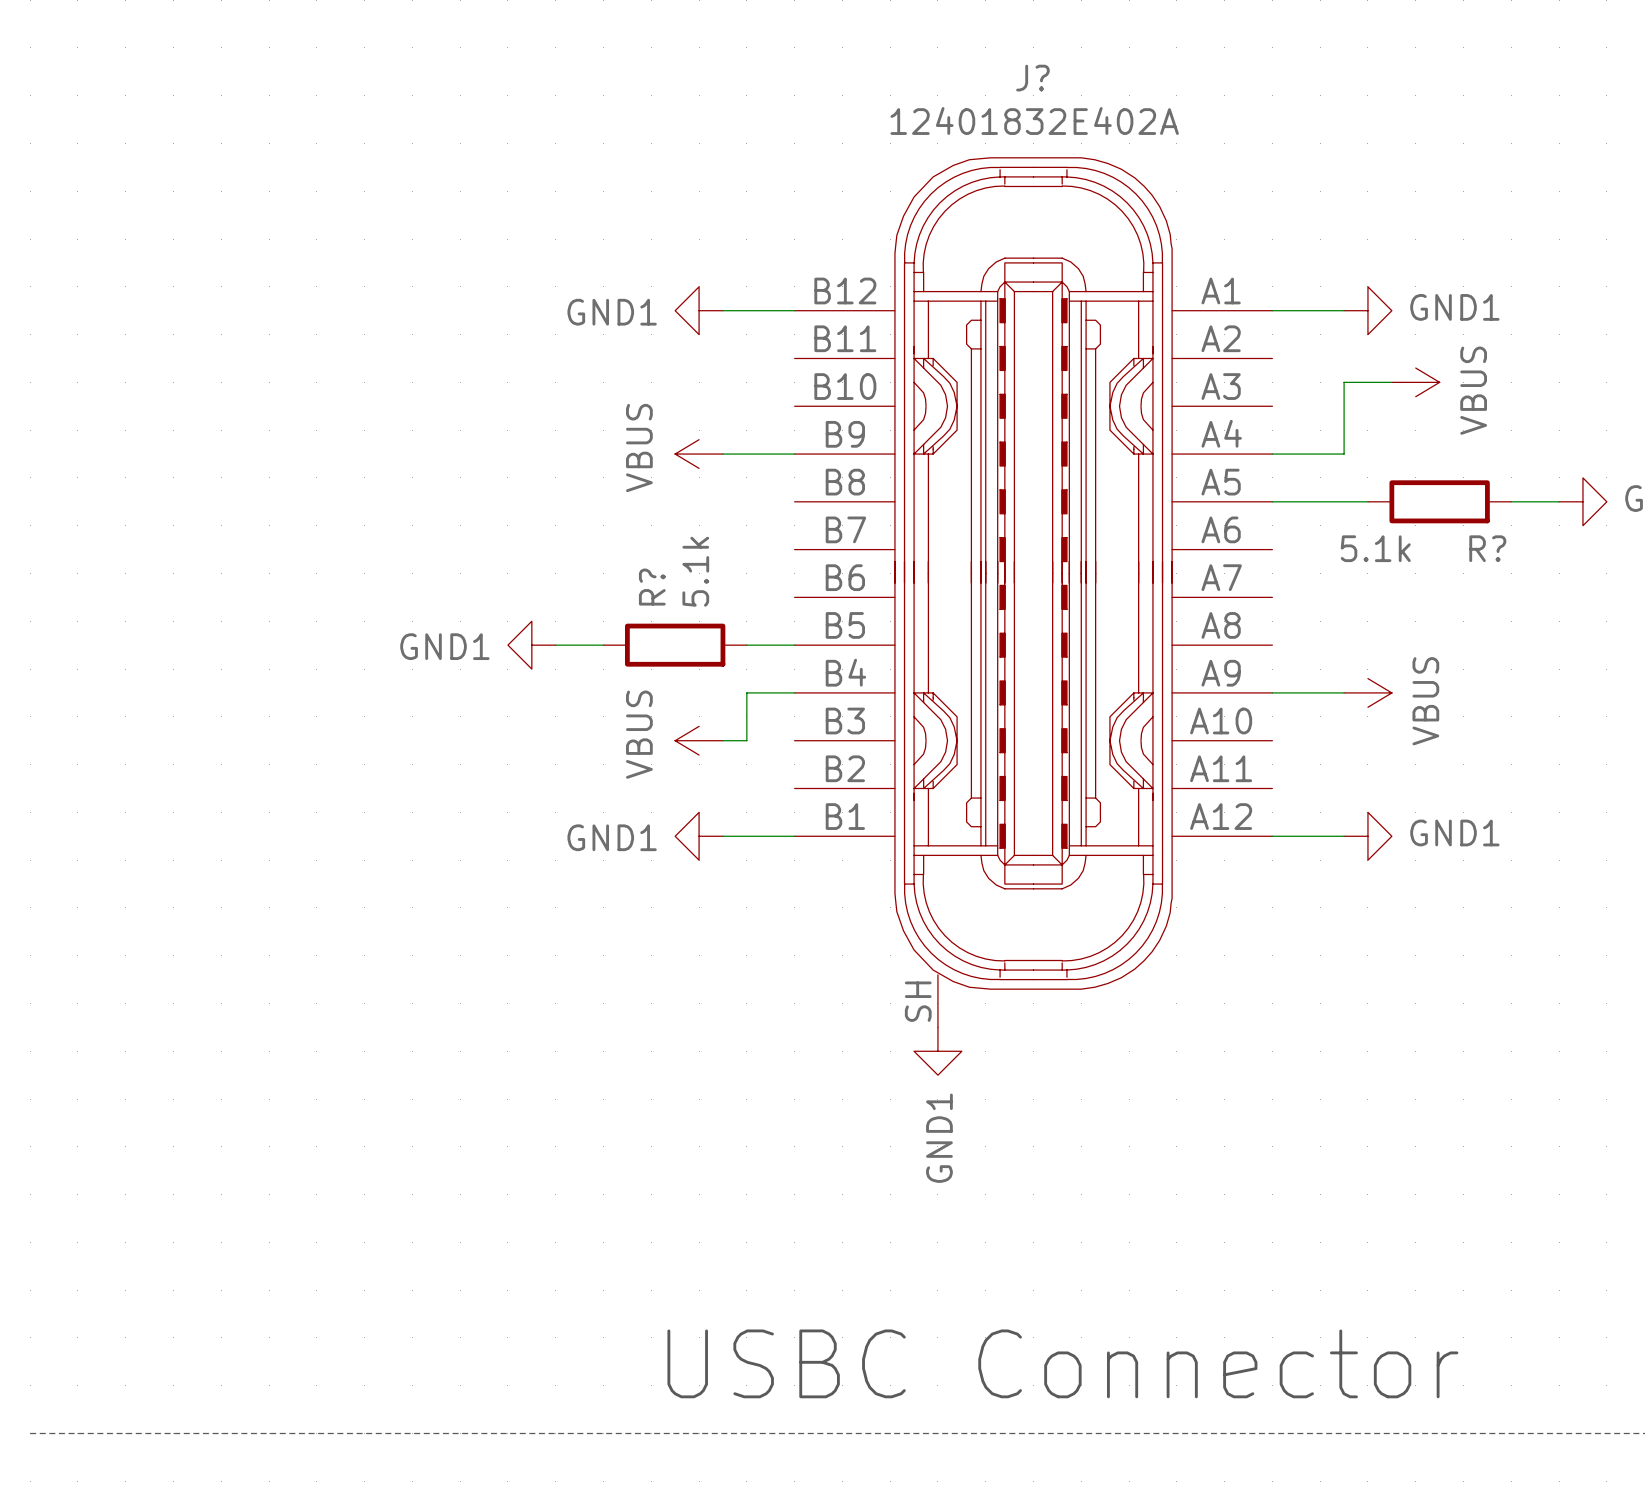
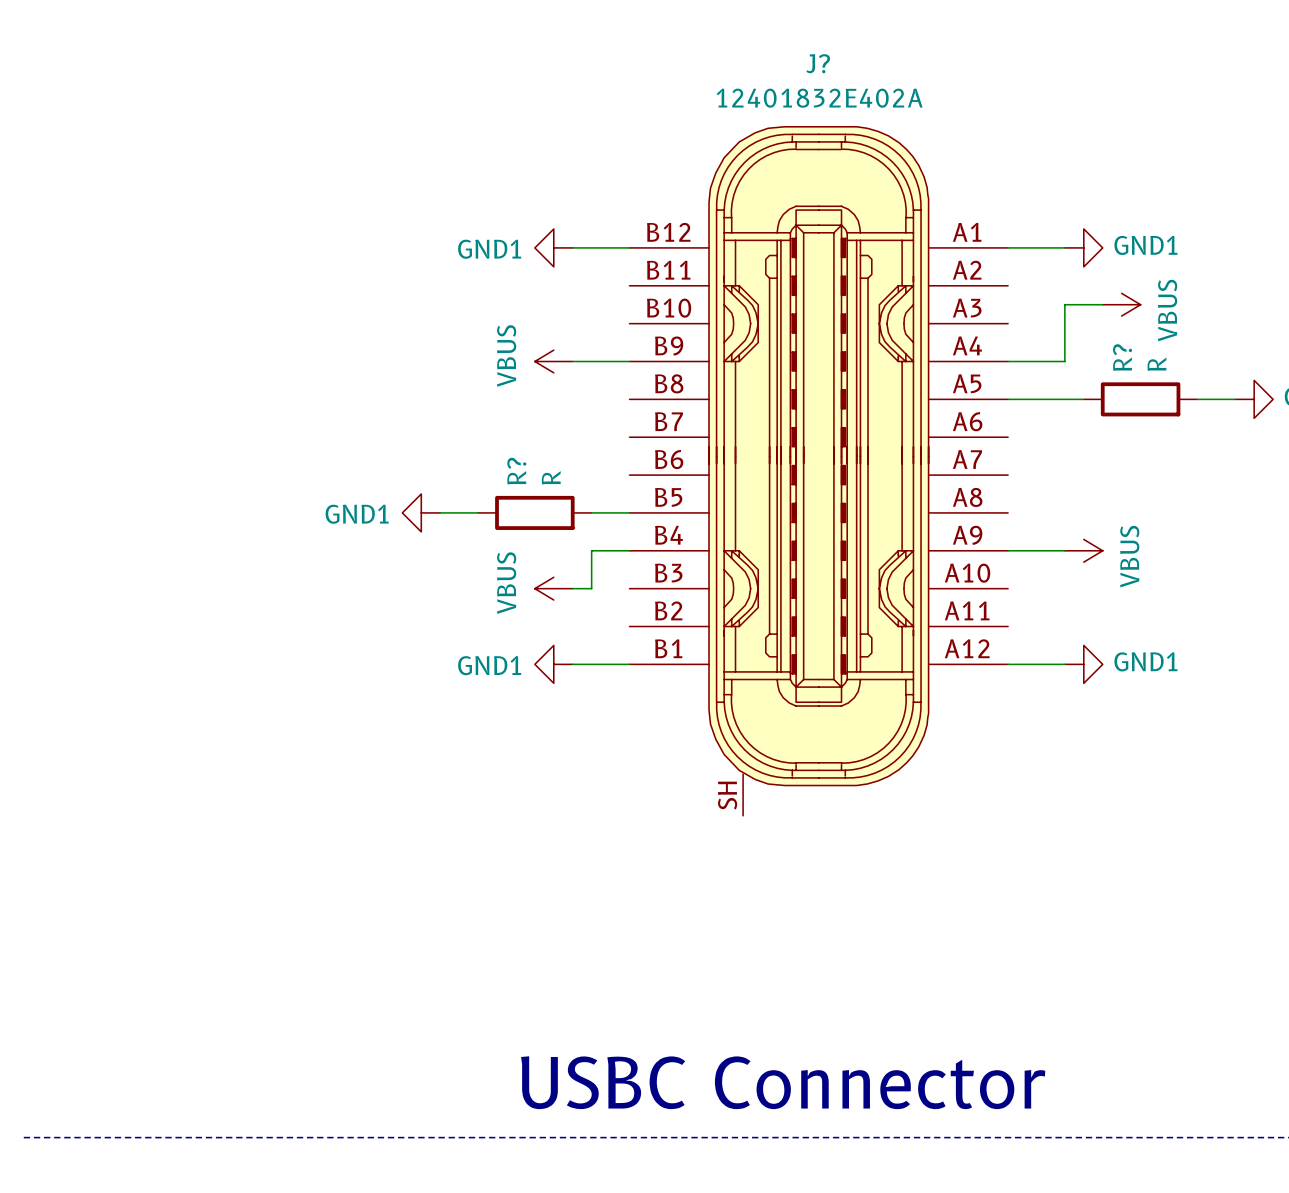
R? value: 5.1k (1375, 548) -> R (1156, 364)
R? name rotation: 0° (1487, 548) -> 90° counterclockwise (1122, 357)
R? name position: R? (1487, 548) -> R? (1122, 357)
R? value: 5.1k (695, 571) -> R (551, 477)
power symbol: GND1 (937, 1051) -> none

